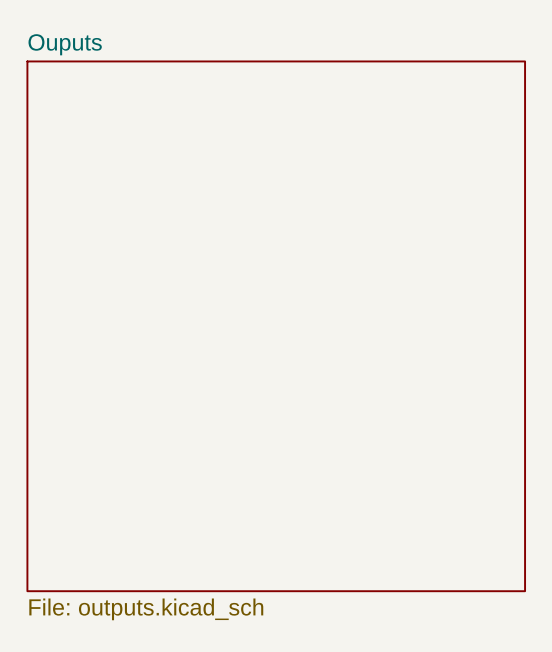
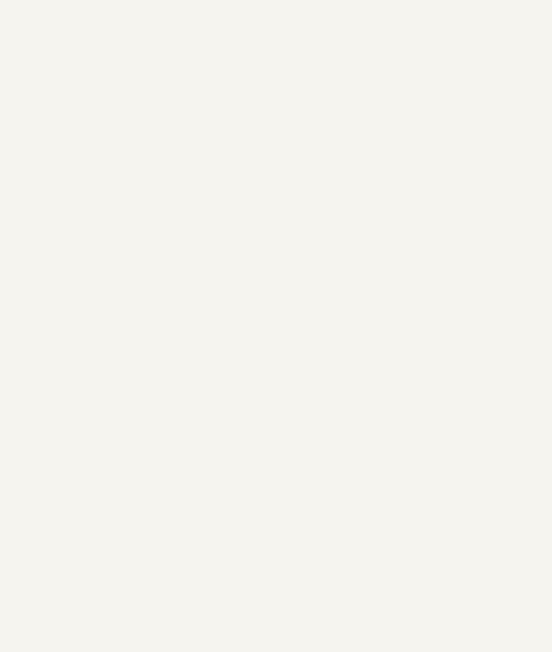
sheet Ouputs: File: outputs.kicad_sch (276, 326) -> none

